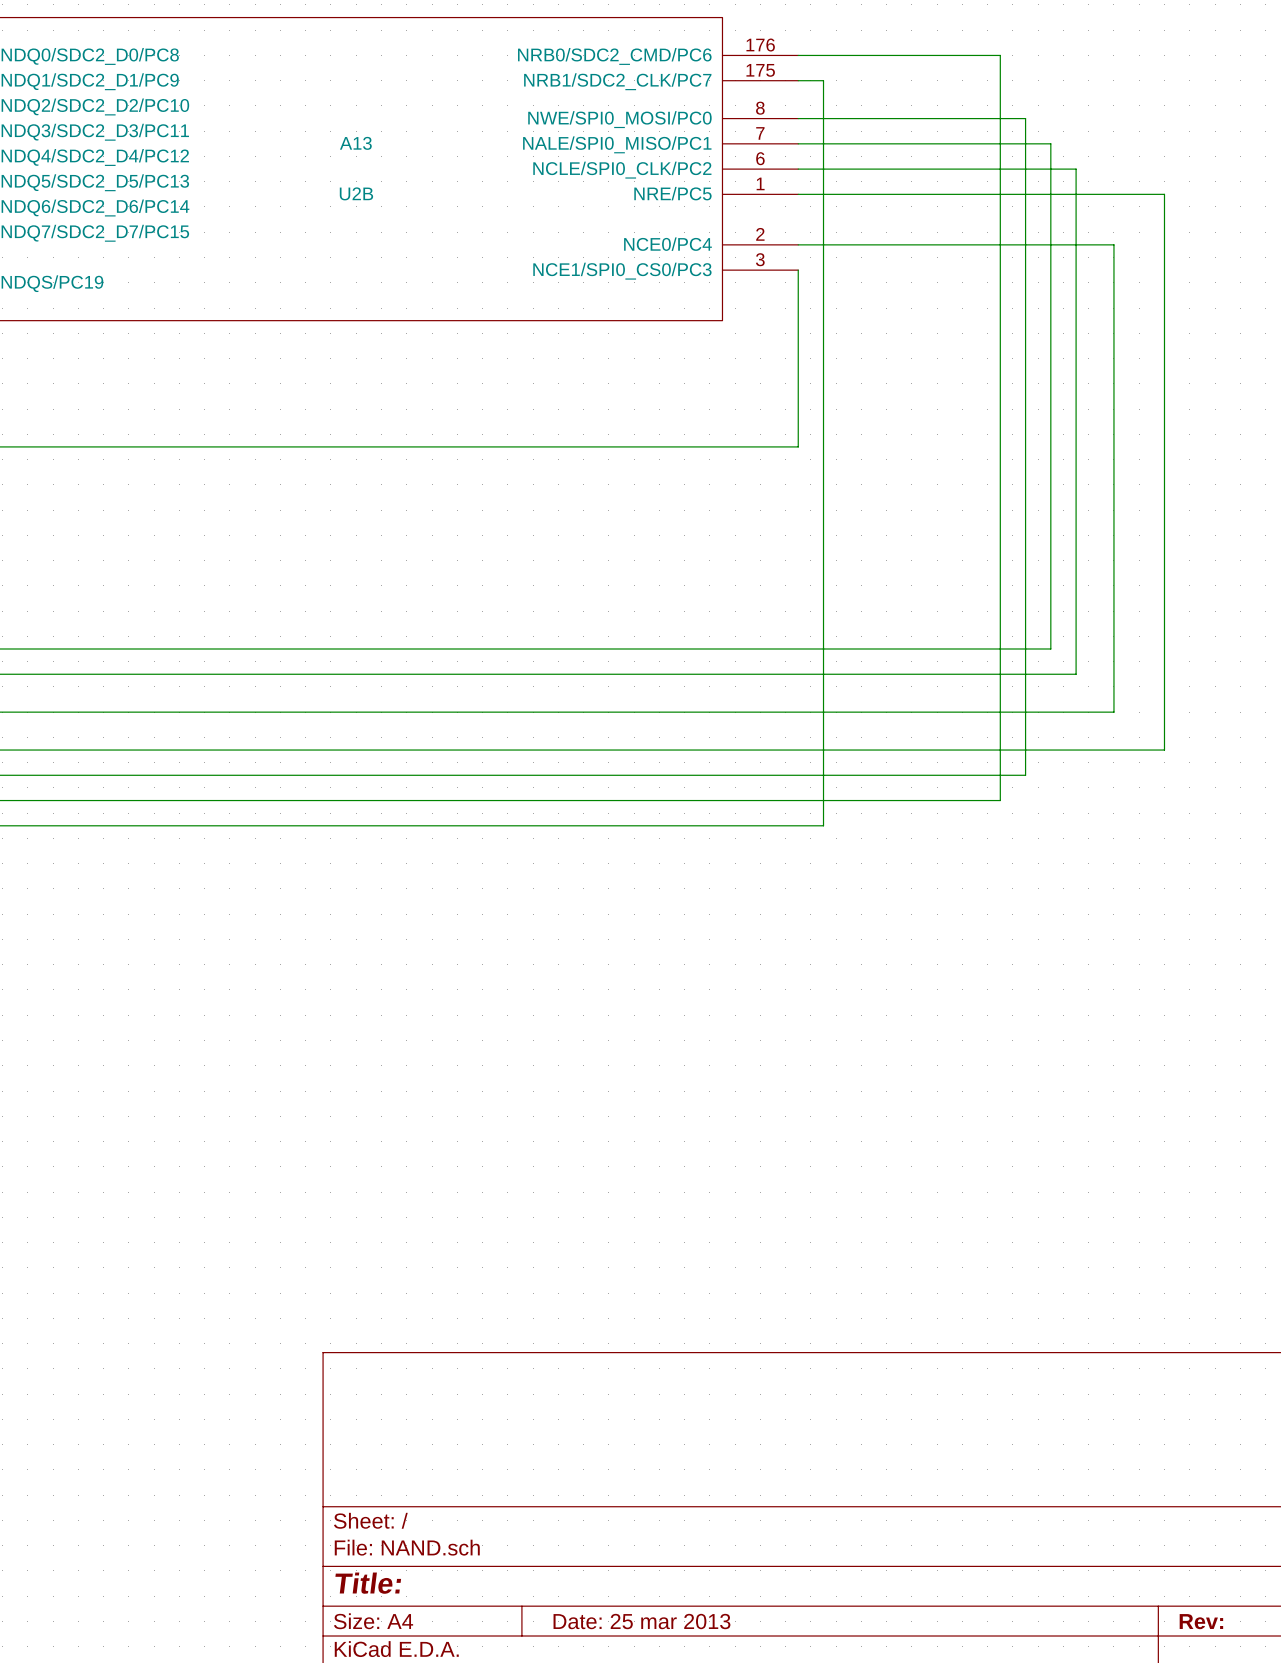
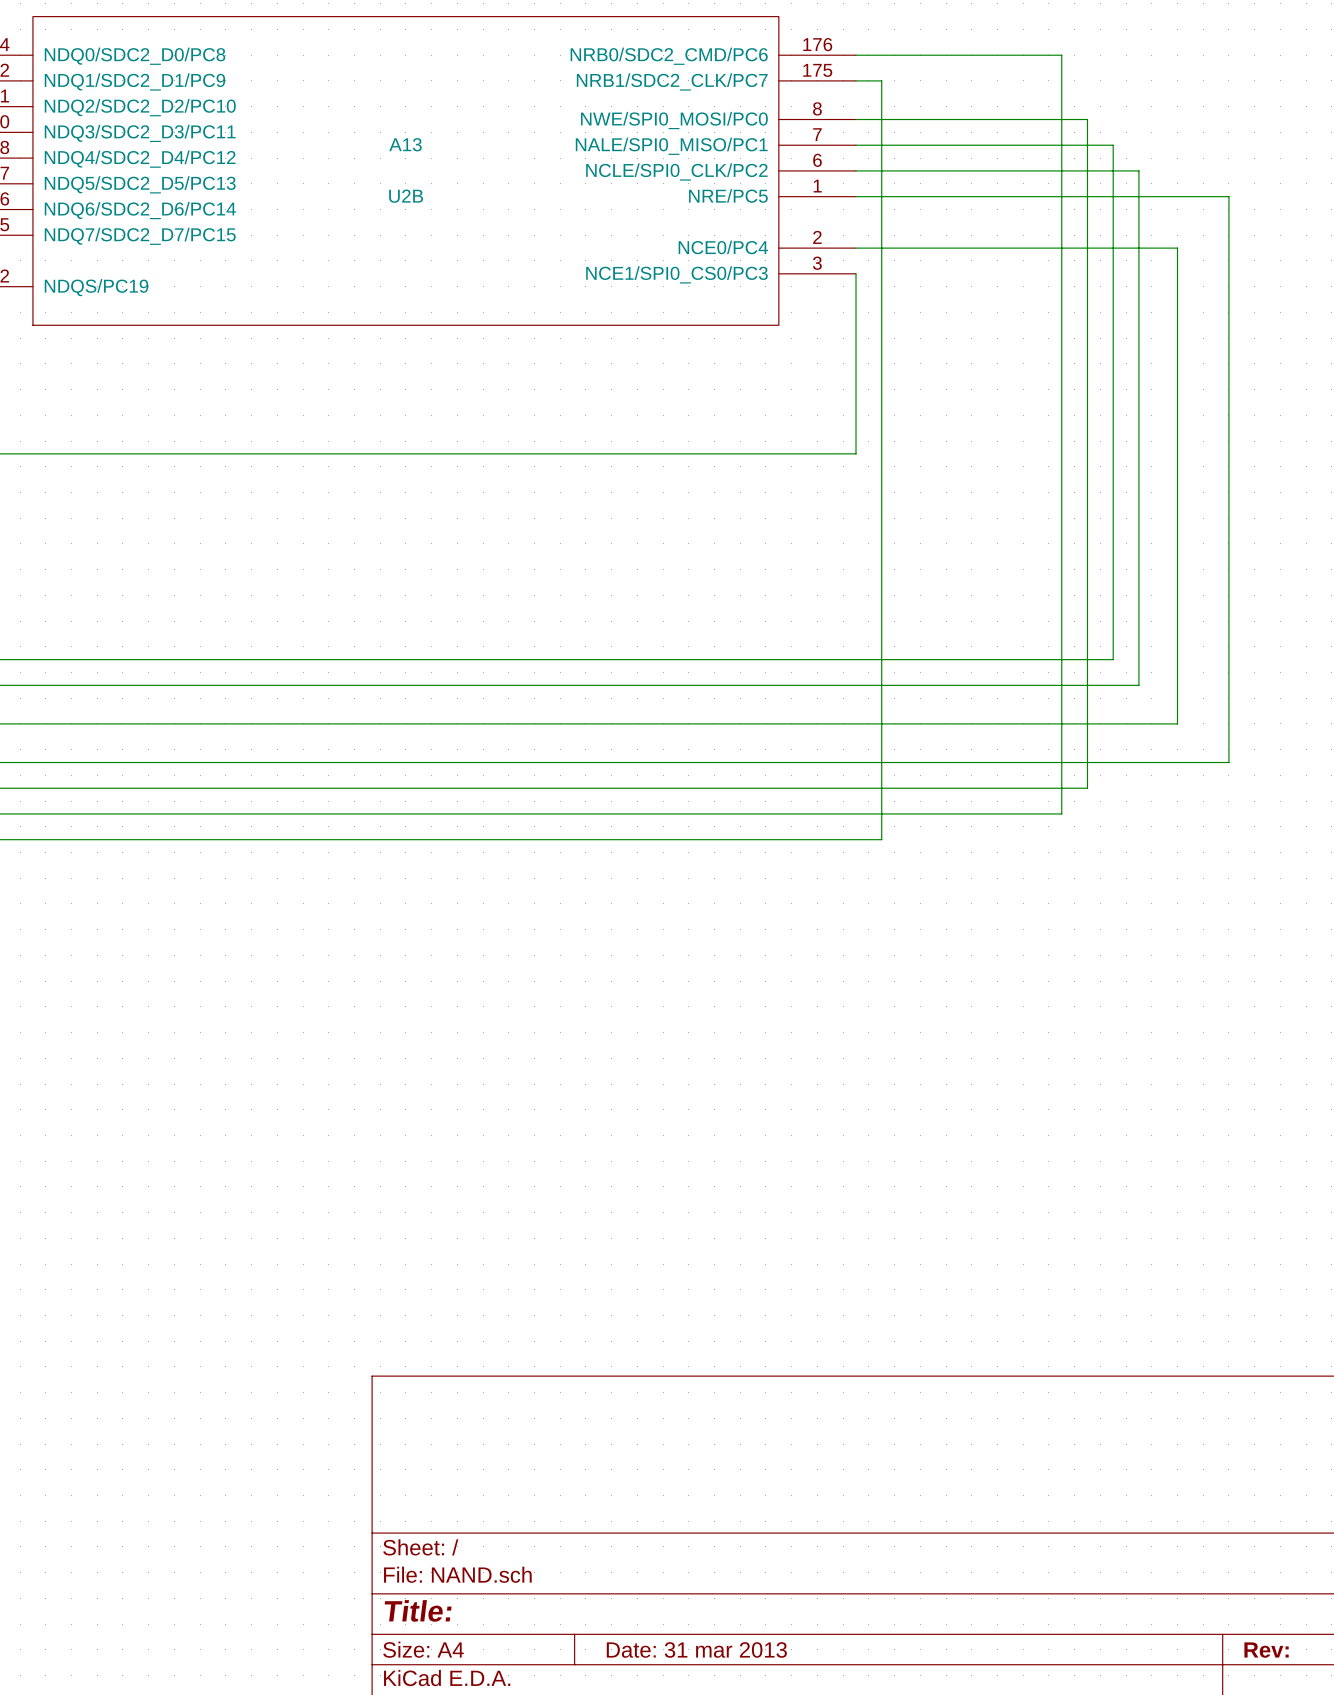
title block: Date: 25 mar 2013 (641, 1621) -> Date: 31 mar 2013 (696, 1649)

